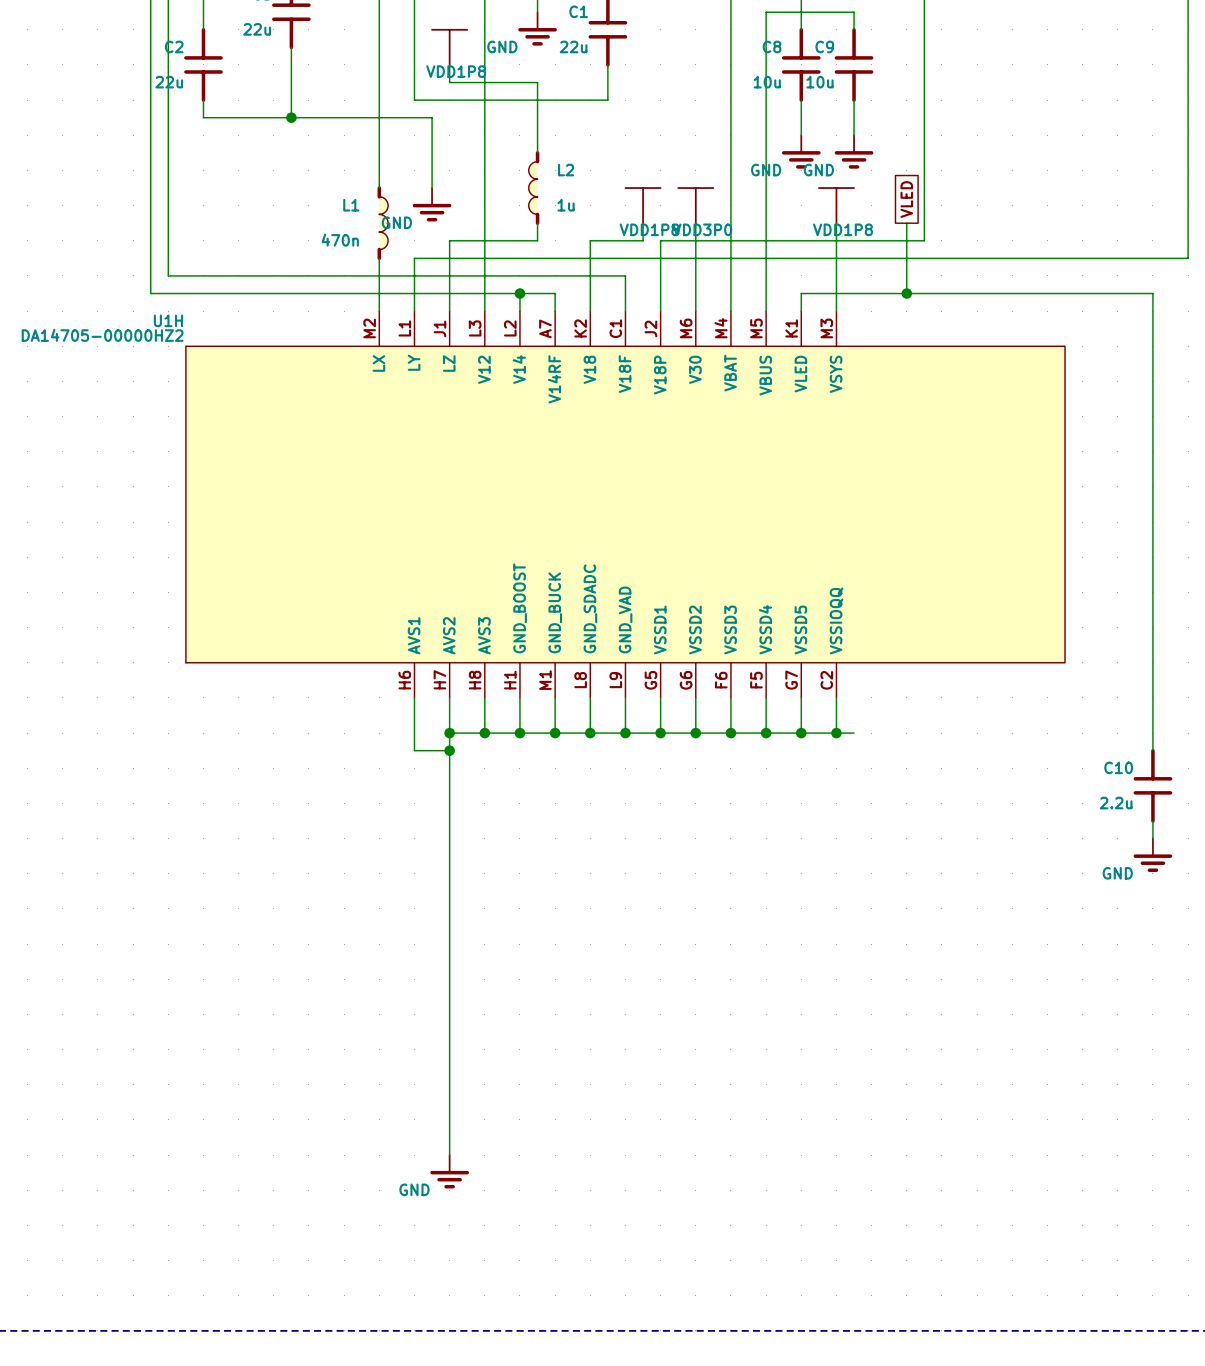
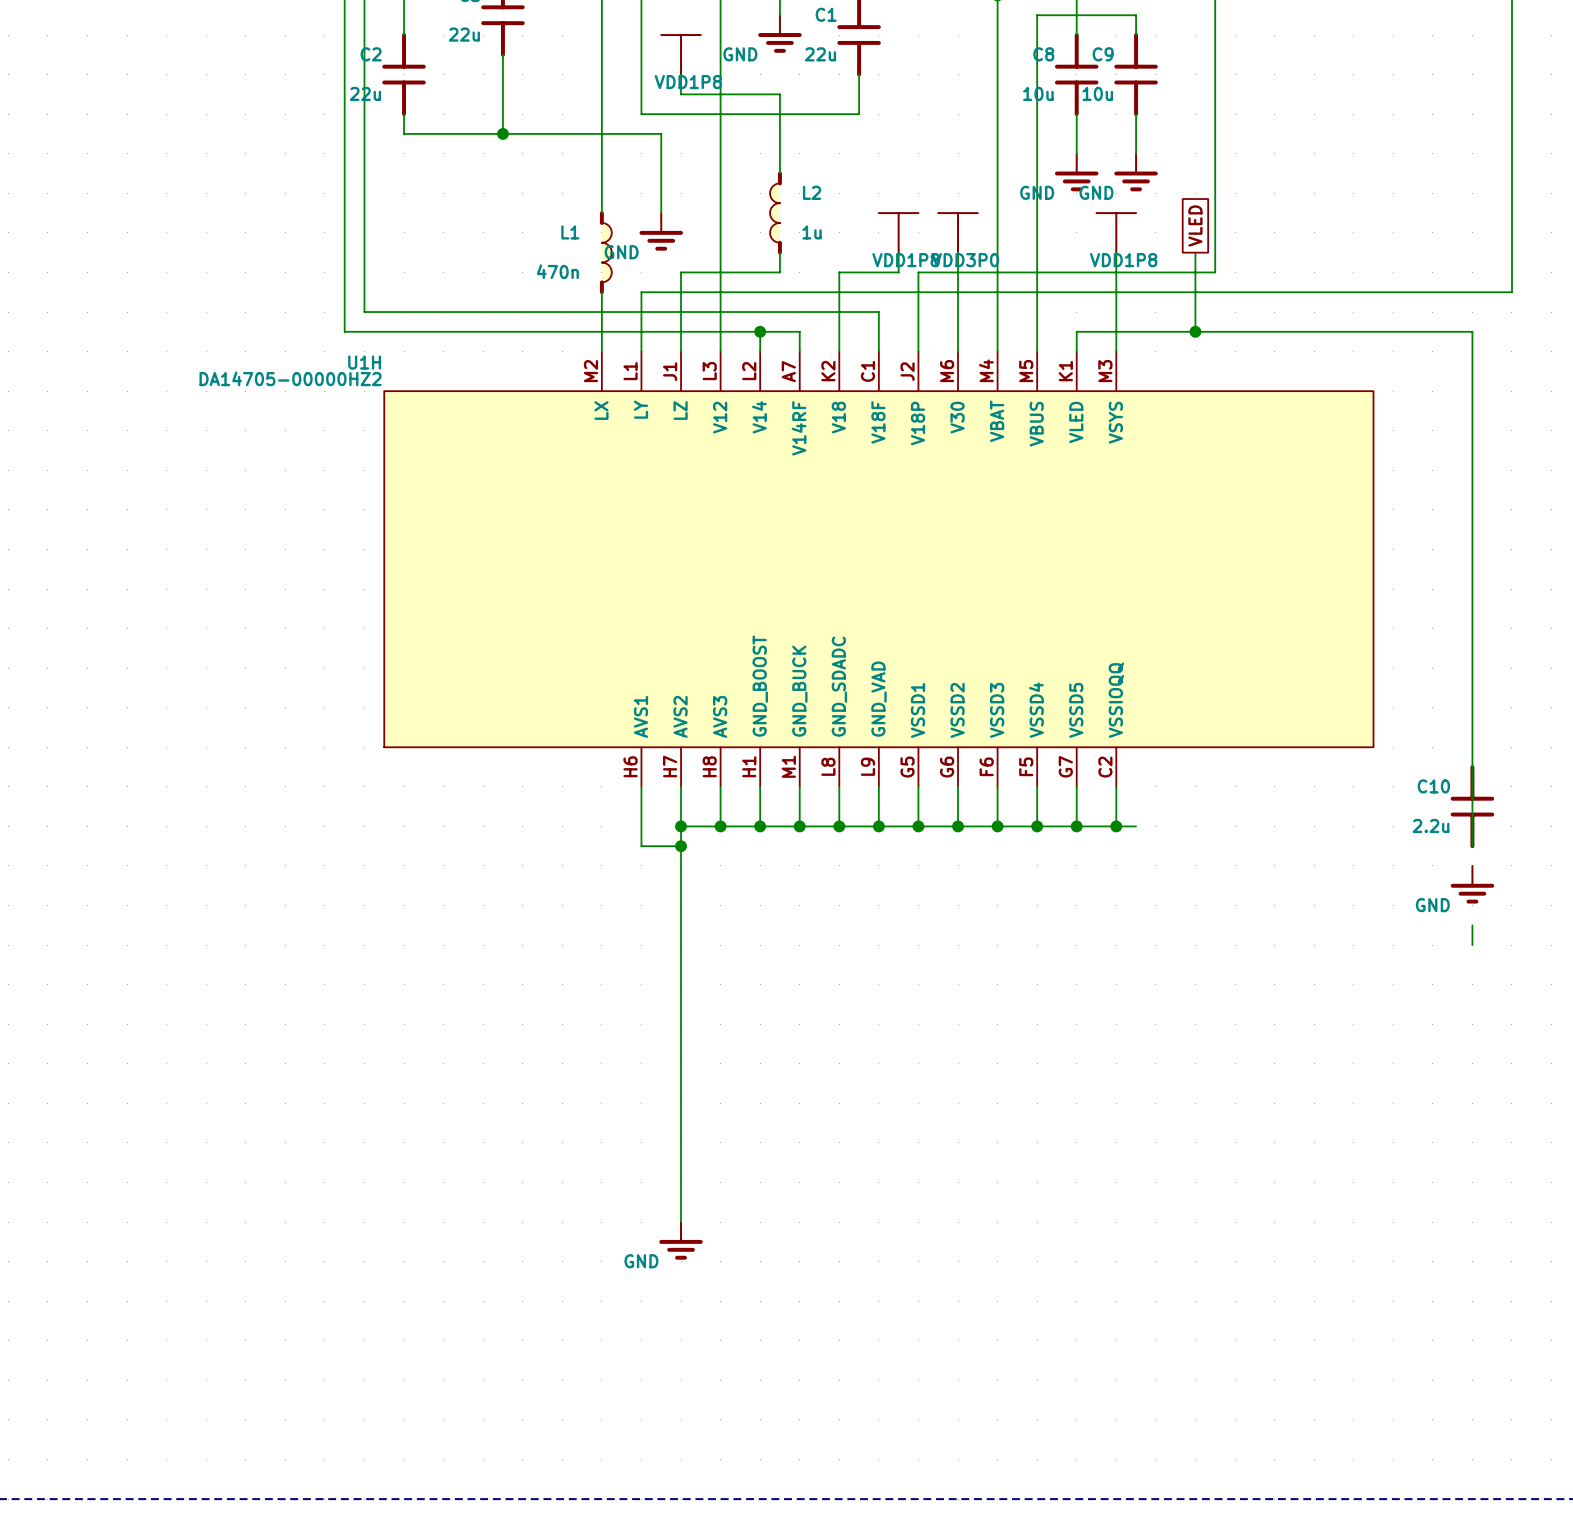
C10 position: (1152, 785) -> (1472, 806)
power symbol position: GND (1152, 854) -> GND (1472, 884)
wire: (449, 1084) (449, 1155) -> none
power symbol position: GND (449, 1171) -> GND (681, 1240)

